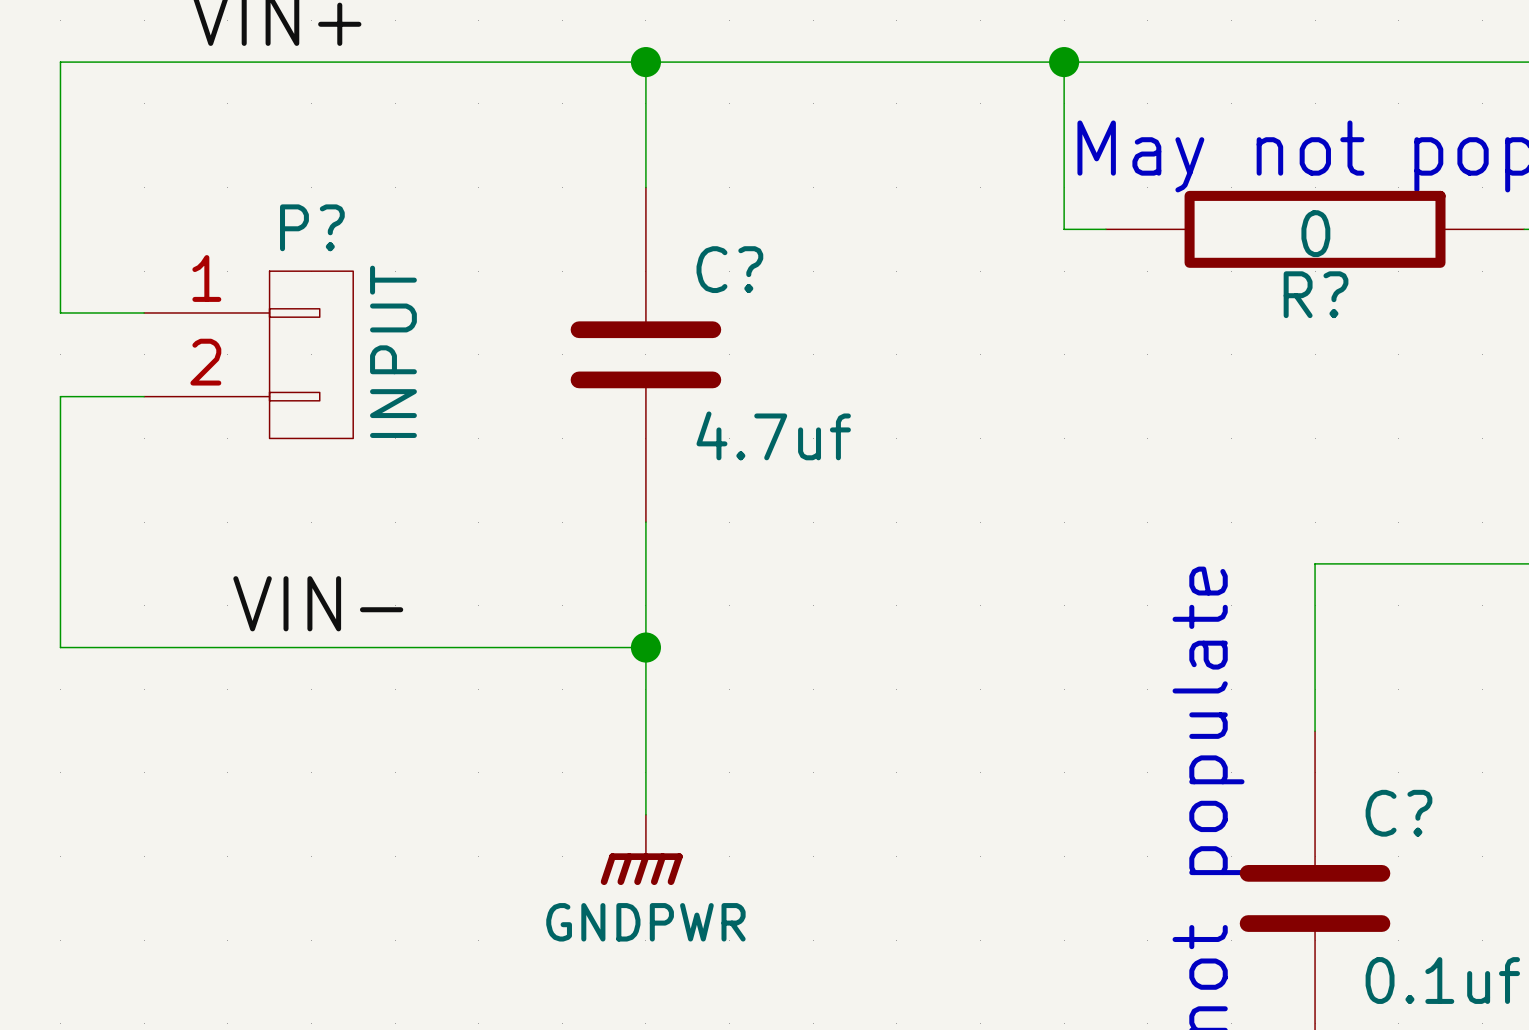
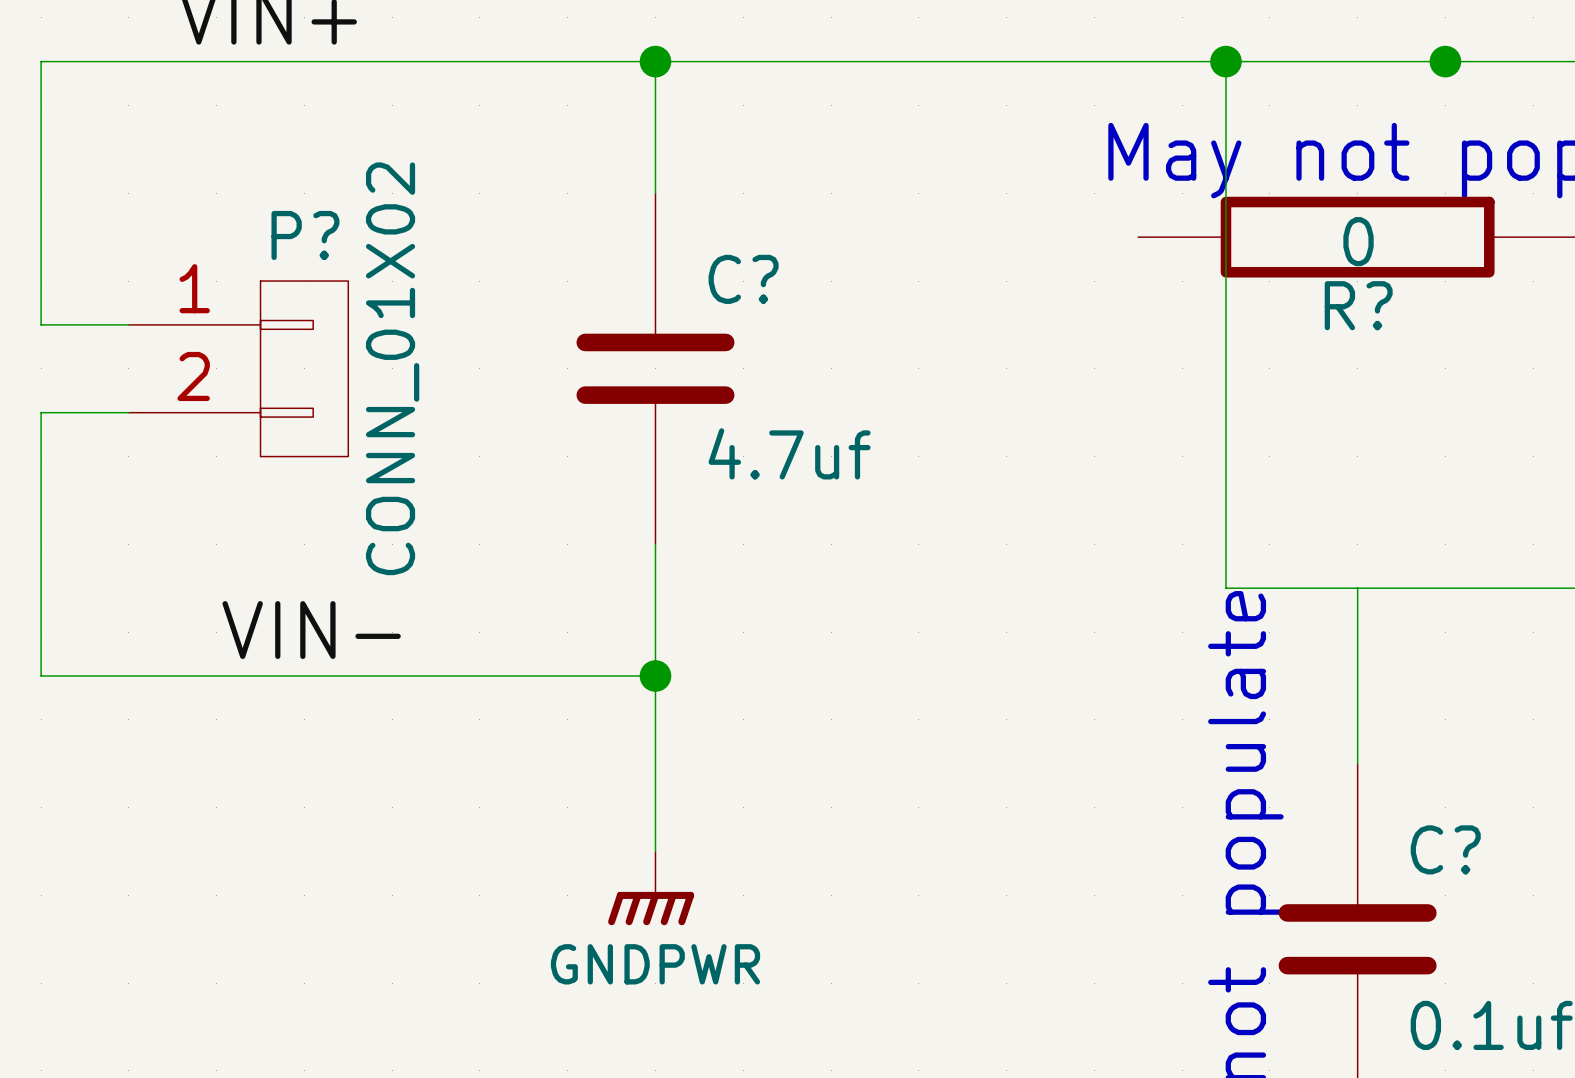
wire: (1064, 62) (1064, 229) (1105, 229) -> none
junction position: (1064, 62) -> (1225, 61)
wire: none -> (1225, 61) (1225, 588) (1357, 588)
junction: none -> (1445, 61)
P? value: INPUT (393, 351) -> CONN_01X02 (392, 368)

